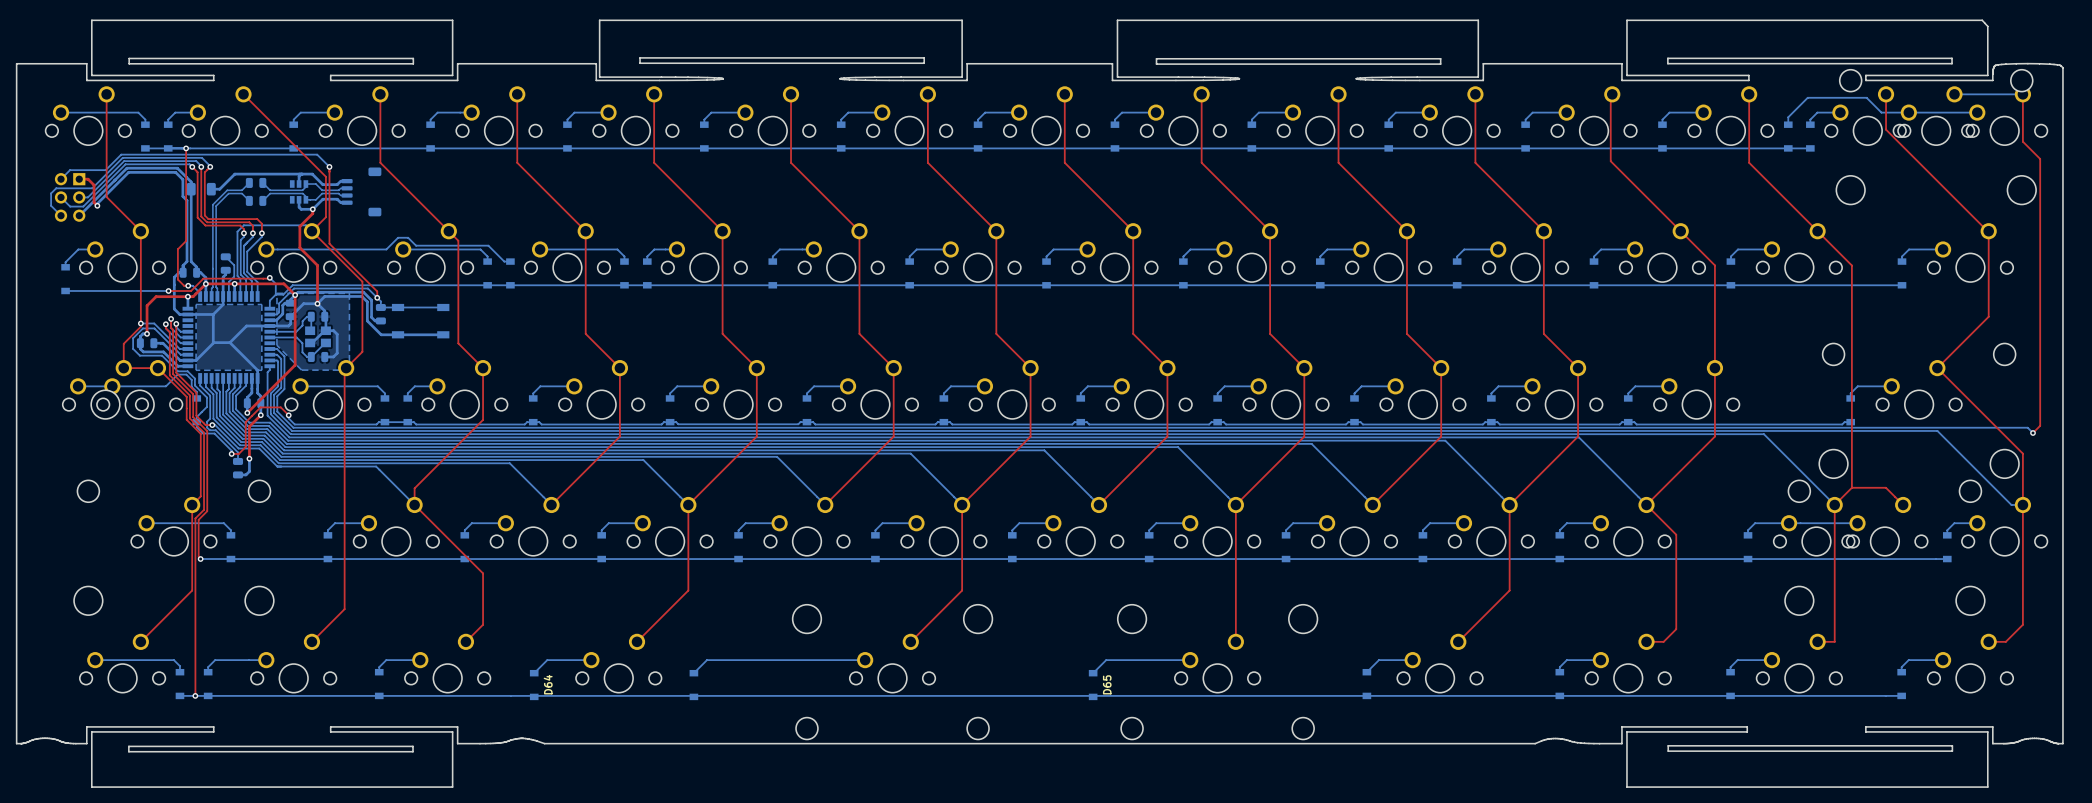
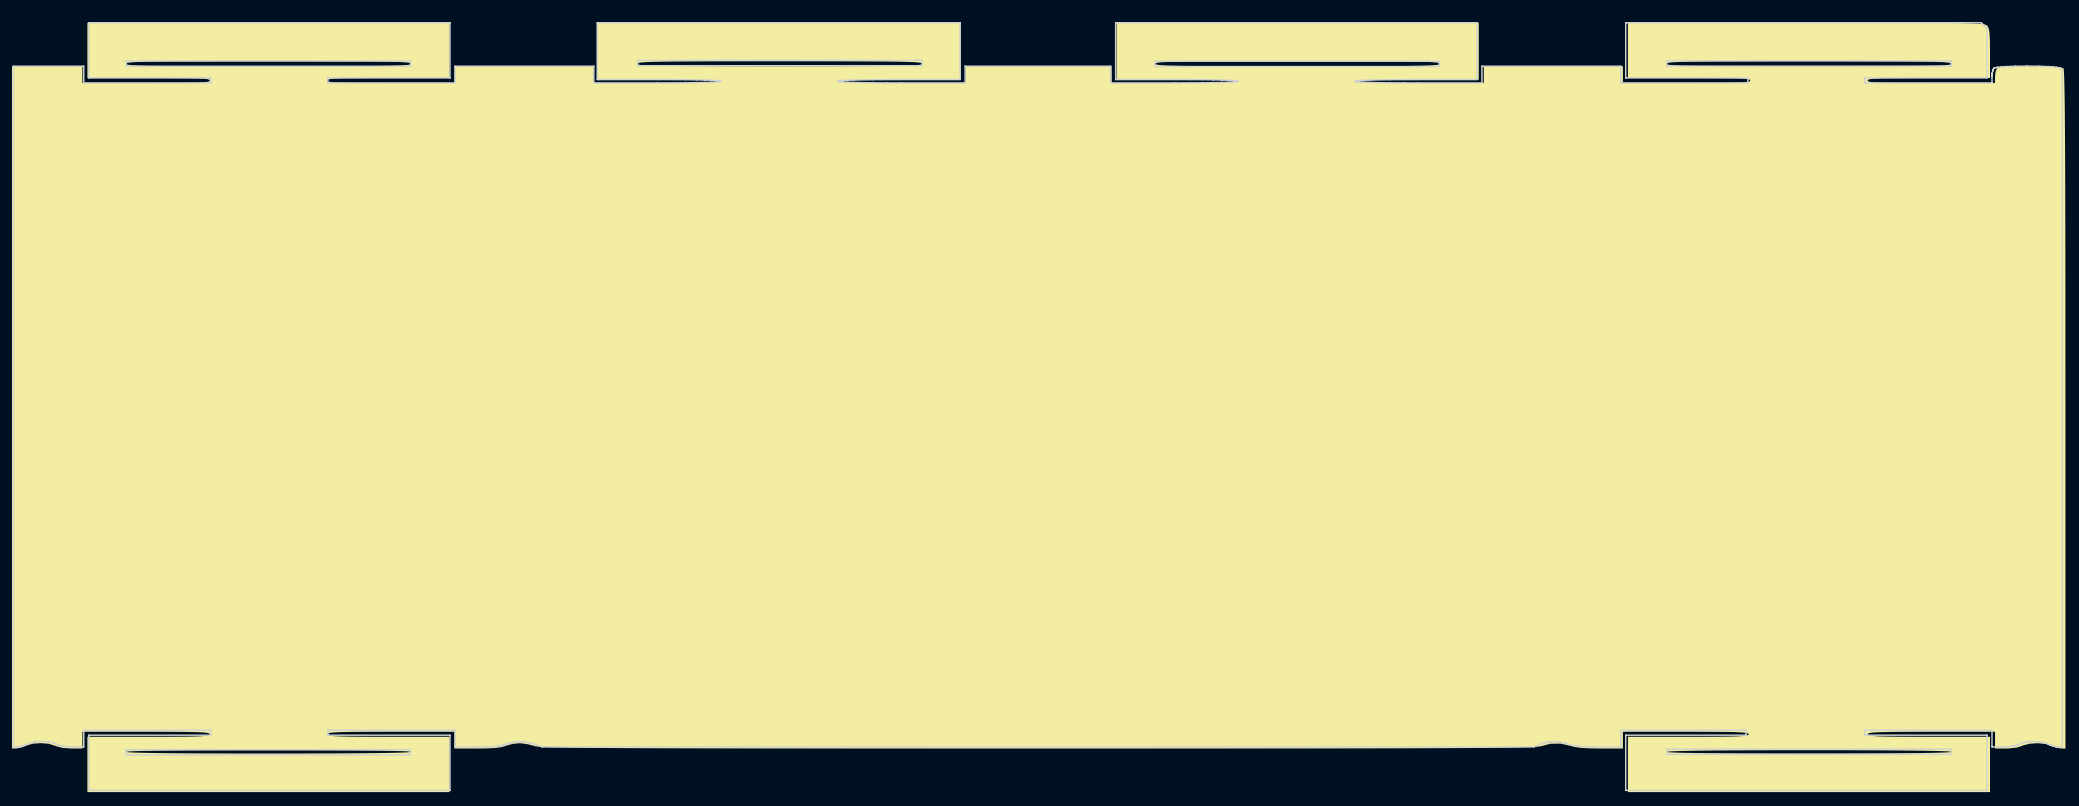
part: none -> (1038, 407)

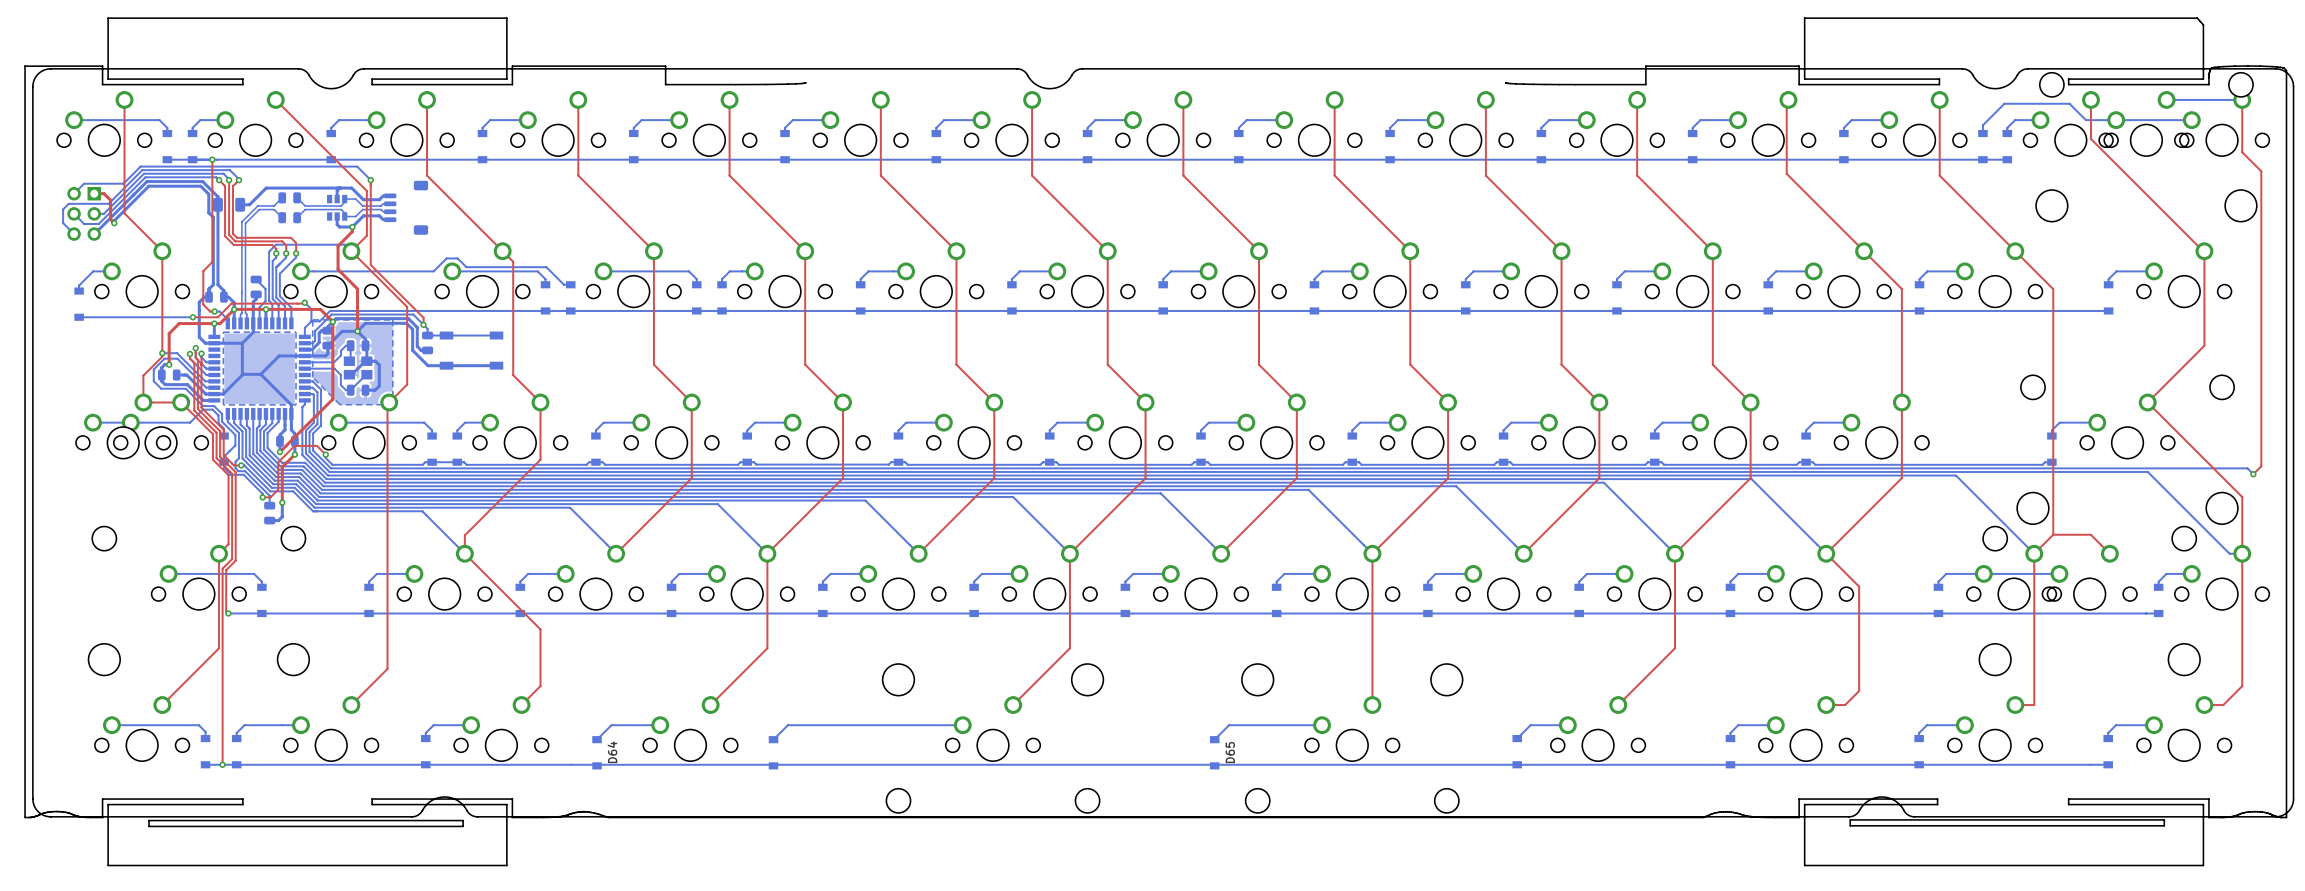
board edge: (126, 60) (410, 60) (410, 66) (126, 66) (126, 60) -> none
board edge: (637, 60) (922, 60) (922, 65) (637, 65) (637, 60) -> none
board edge: (1666, 60) (1951, 60) (1951, 66) (1666, 66) (1666, 60) -> none
board edge: (1154, 61) (1439, 61) (1439, 66) (1154, 66) (1154, 61) -> none
board edge: none -> (50, 68) (299, 68) (306, 72) (316, 84) (331, 88) (342, 85) (356, 71) (363, 68) (1017, 68) (1024, 71) (1038, 85) (1049, 88) (1061, 85) (1075, 71) (1082, 68) (1962, 68) (1969, 71) (1983, 85) (1995, 88) (2009, 84) (2019, 72) (2026, 68) (2280, 69) (2289, 75) (2293, 86) (2292, 803) (2286, 813) (2275, 816) (1914, 816) (1907, 814) (1895, 801) (1881, 796) (1867, 801) (1856, 814) (1848, 816) (477, 816) (470, 814) (458, 801) (444, 796) (430, 801) (419, 814) (411, 816) (46, 816) (36, 809) (32, 798) (32, 86) (38, 74) (50, 68)
board edge: (720, 81) (597, 79) (597, 22) (960, 22) (960, 79) (838, 81) -> none
board edge: (1237, 81) (1115, 79) (1115, 22) (1476, 22) (1476, 79) (1354, 81) -> none
board edge: (1237, 81) (1110, 82) (1110, 66) (965, 66) (965, 82) (838, 81) -> none
part: (1038, 407) -> none

